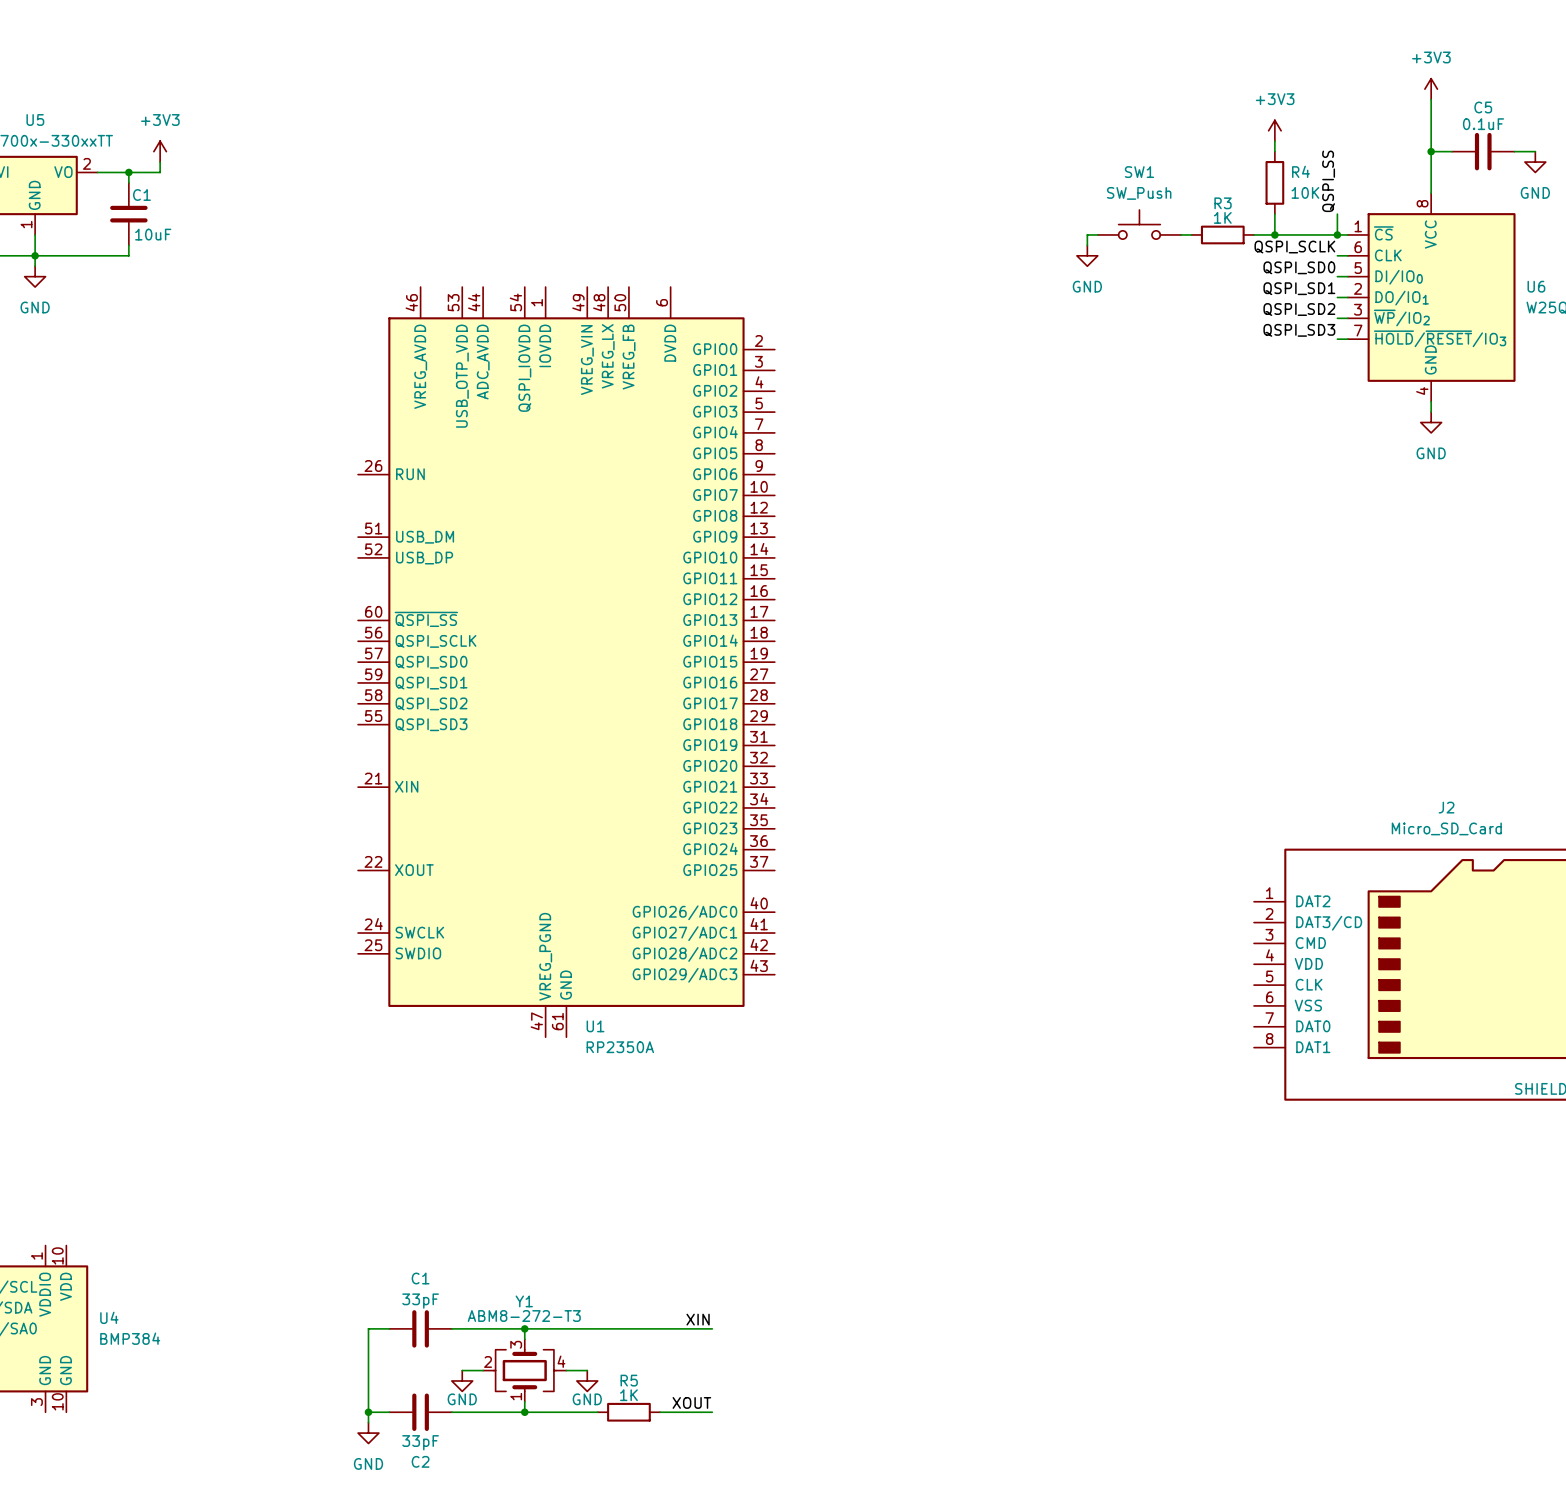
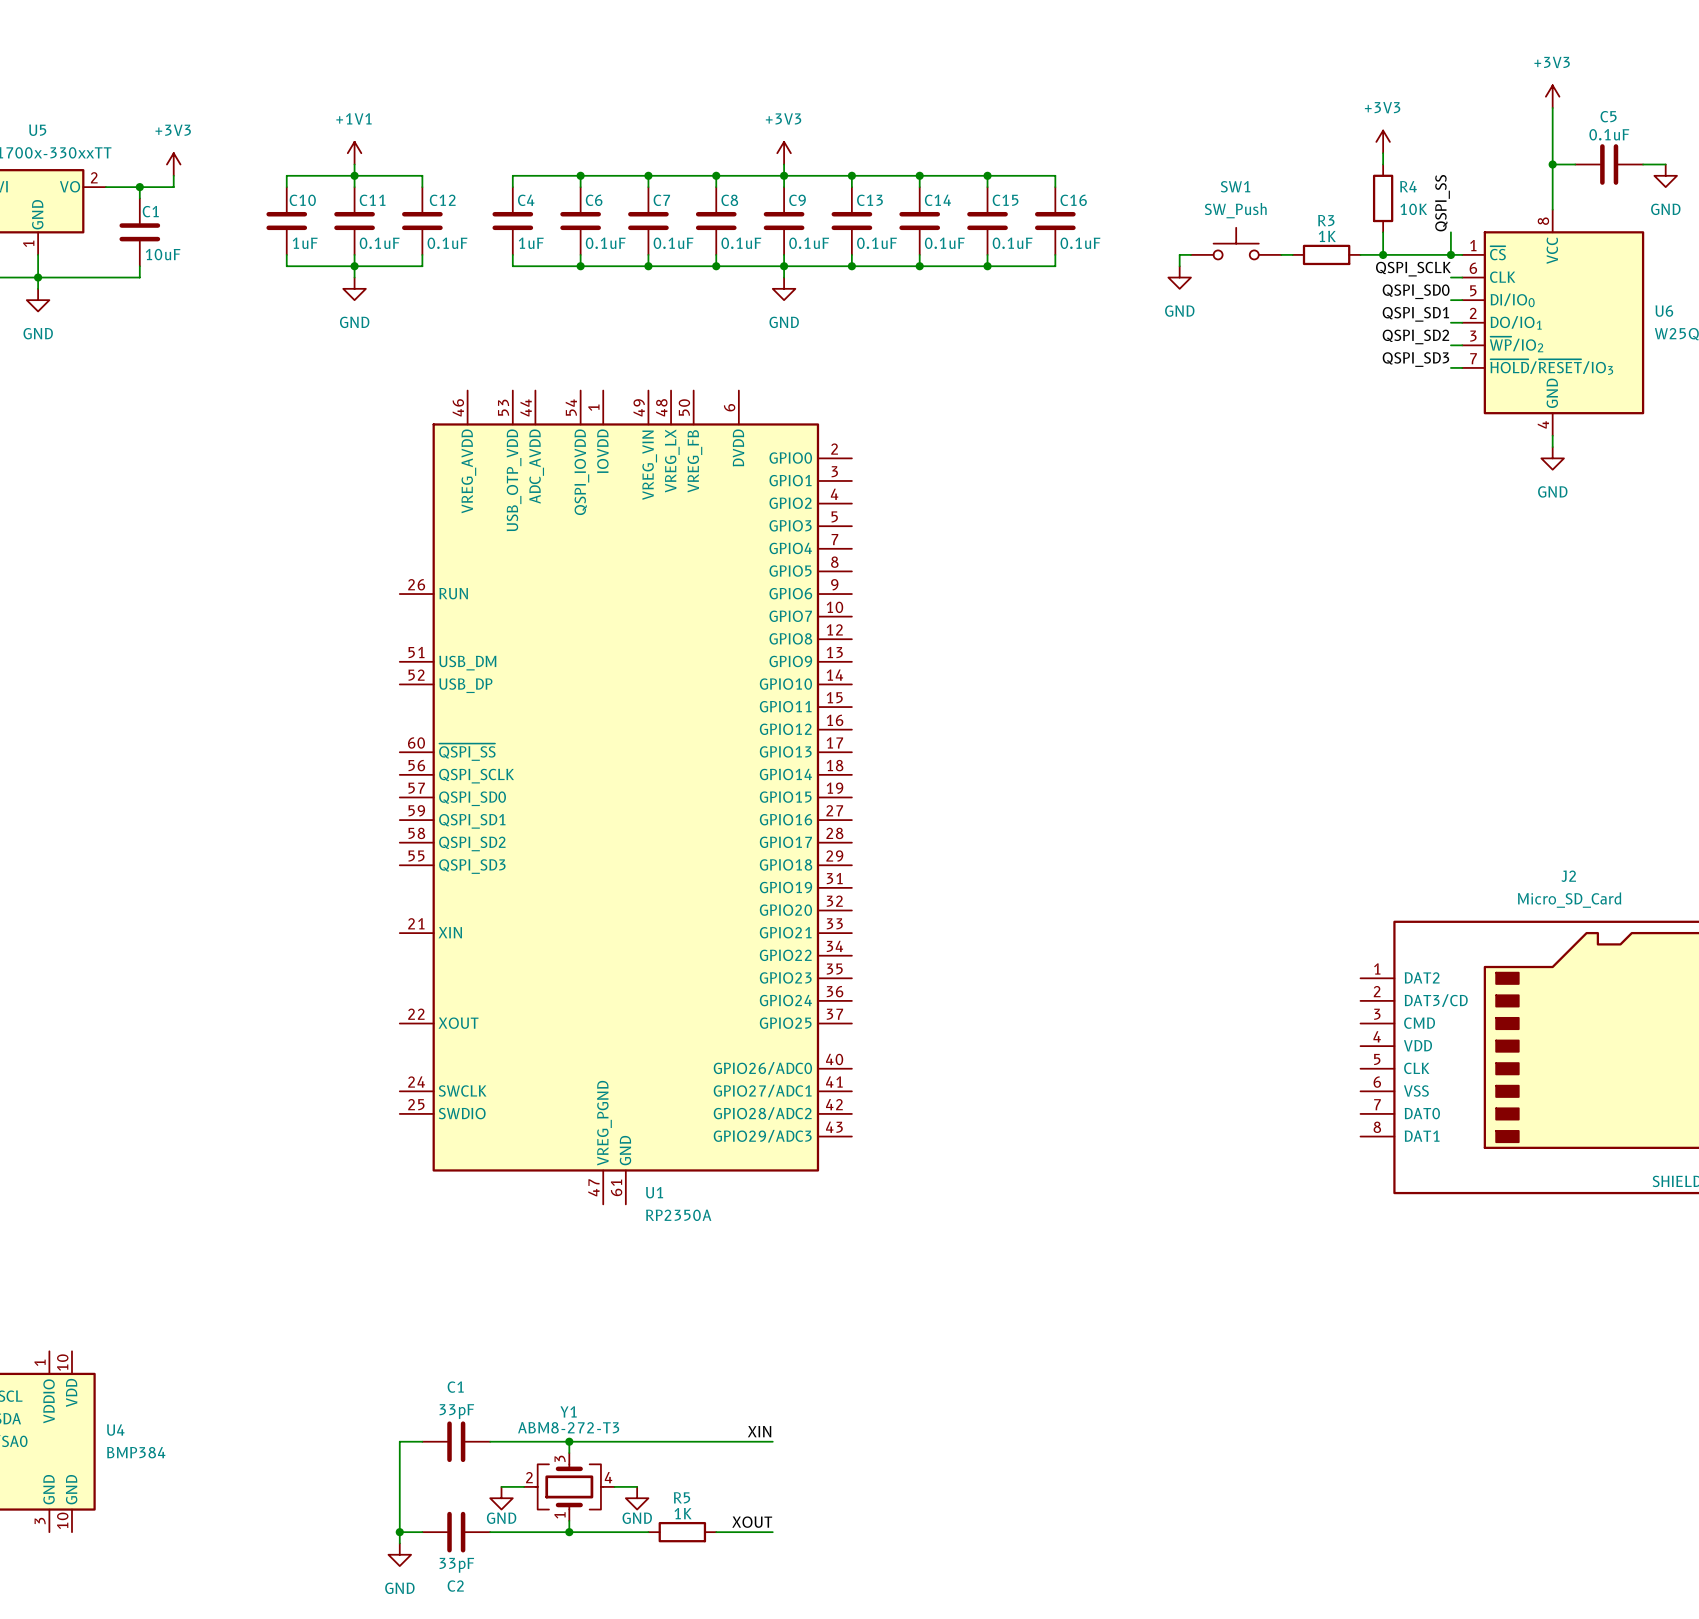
power symbol: none -> +1V1 (354, 153)
power symbol: none -> +3V3 (784, 153)
wire: none -> (354, 164) (354, 187)
wire: none -> (784, 164) (784, 187)
junction: none -> (354, 175)
wire: none -> (580, 175) (580, 187)
junction: none -> (580, 175)
wire: none -> (648, 175) (648, 187)
junction: none -> (648, 175)
wire: none -> (716, 175) (716, 187)
junction: none -> (716, 175)
junction: none -> (784, 175)
wire: none -> (851, 175) (851, 187)
junction: none -> (851, 175)
wire: none -> (919, 175) (919, 187)
junction: none -> (919, 175)
wire: none -> (987, 175) (987, 187)
junction: none -> (987, 175)
wire: none -> (286, 187) (286, 175) (422, 175) (422, 187)
wire: none -> (512, 187) (512, 175) (1055, 175) (1055, 187)
C10: none -> 1uF (286, 221)
C11: none -> 0.1uF (354, 221)
C12: none -> 0.1uF (422, 221)
C4: none -> 1uF (512, 221)
C6: none -> 0.1uF (580, 221)
C7: none -> 0.1uF (648, 221)
C8: none -> 0.1uF (716, 221)
C9: none -> 0.1uF (784, 221)
C13: none -> 0.1uF (851, 221)
C14: none -> 0.1uF (919, 221)
C15: none -> 0.1uF (987, 221)
C16: none -> 0.1uF (1055, 221)
wire: none -> (286, 254) (286, 266) (422, 266) (422, 254)
wire: none -> (354, 254) (354, 277)
wire: none -> (512, 254) (512, 266) (1055, 266) (1055, 254)
wire: none -> (580, 254) (580, 266)
wire: none -> (648, 254) (648, 266)
wire: none -> (716, 254) (716, 266)
wire: none -> (784, 254) (784, 277)
wire: none -> (851, 254) (851, 266)
wire: none -> (919, 254) (919, 266)
wire: none -> (987, 254) (987, 266)
junction: none -> (354, 266)
junction: none -> (580, 266)
junction: none -> (648, 266)
junction: none -> (716, 266)
junction: none -> (784, 266)
junction: none -> (851, 266)
junction: none -> (919, 266)
junction: none -> (987, 266)
power symbol: none -> GND (354, 288)
power symbol: none -> GND (784, 288)
U1 position: (566, 662) -> (625, 797)

